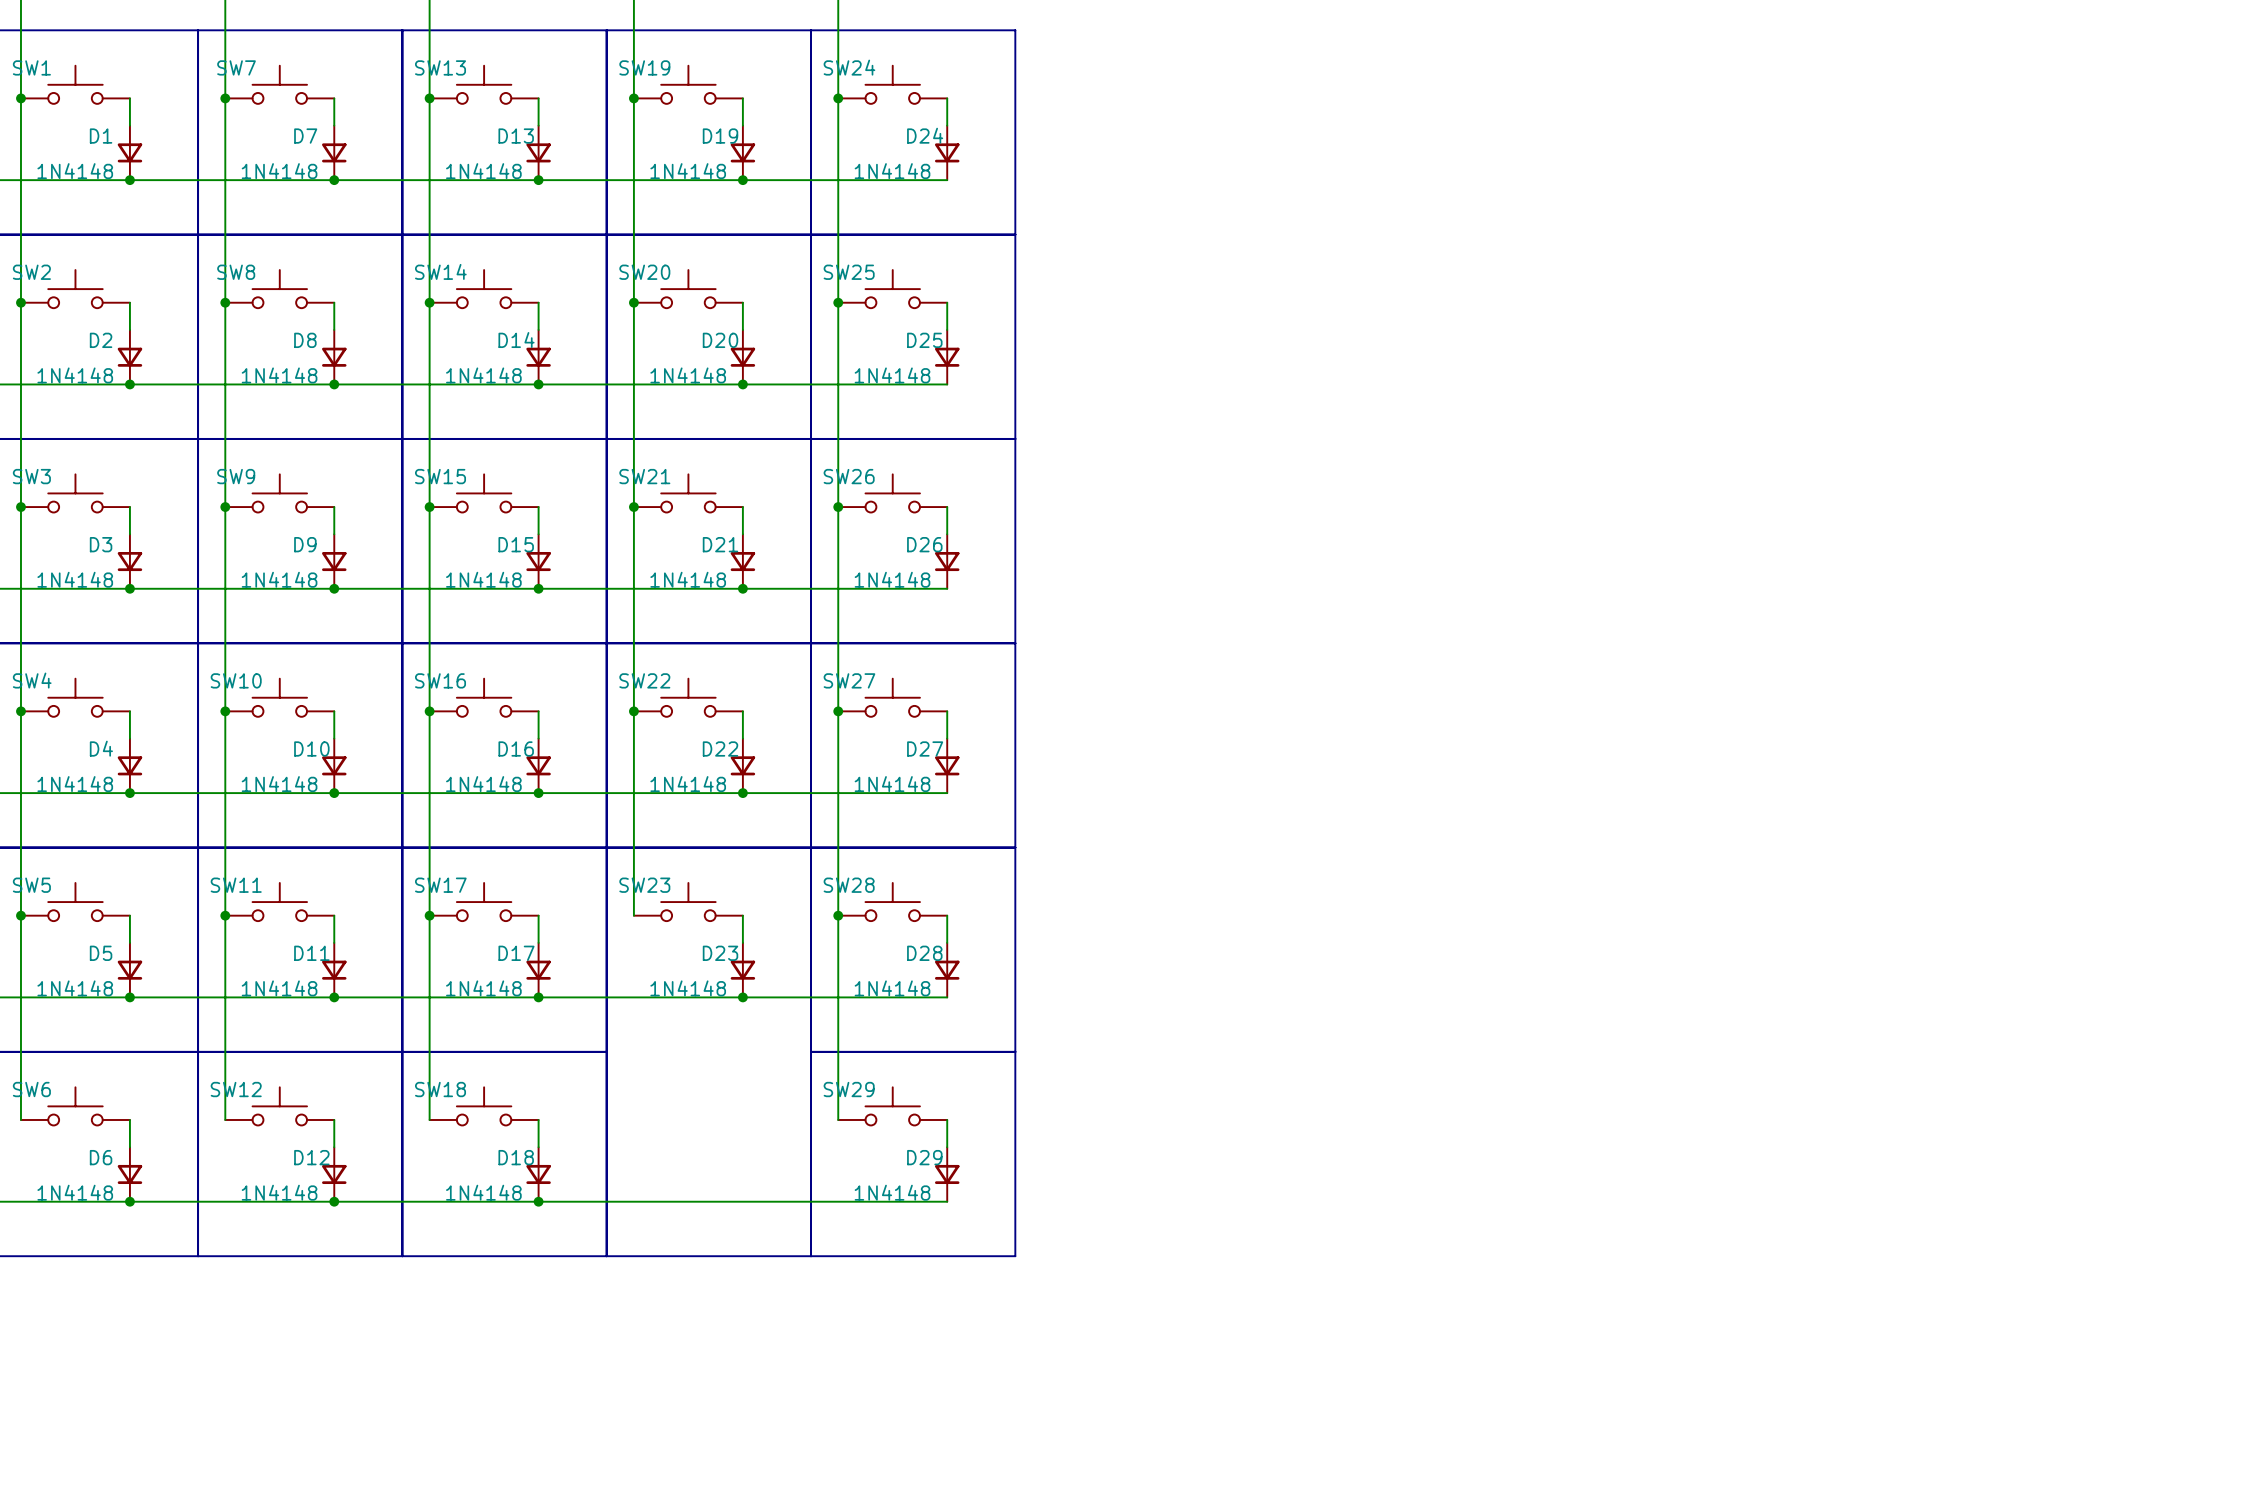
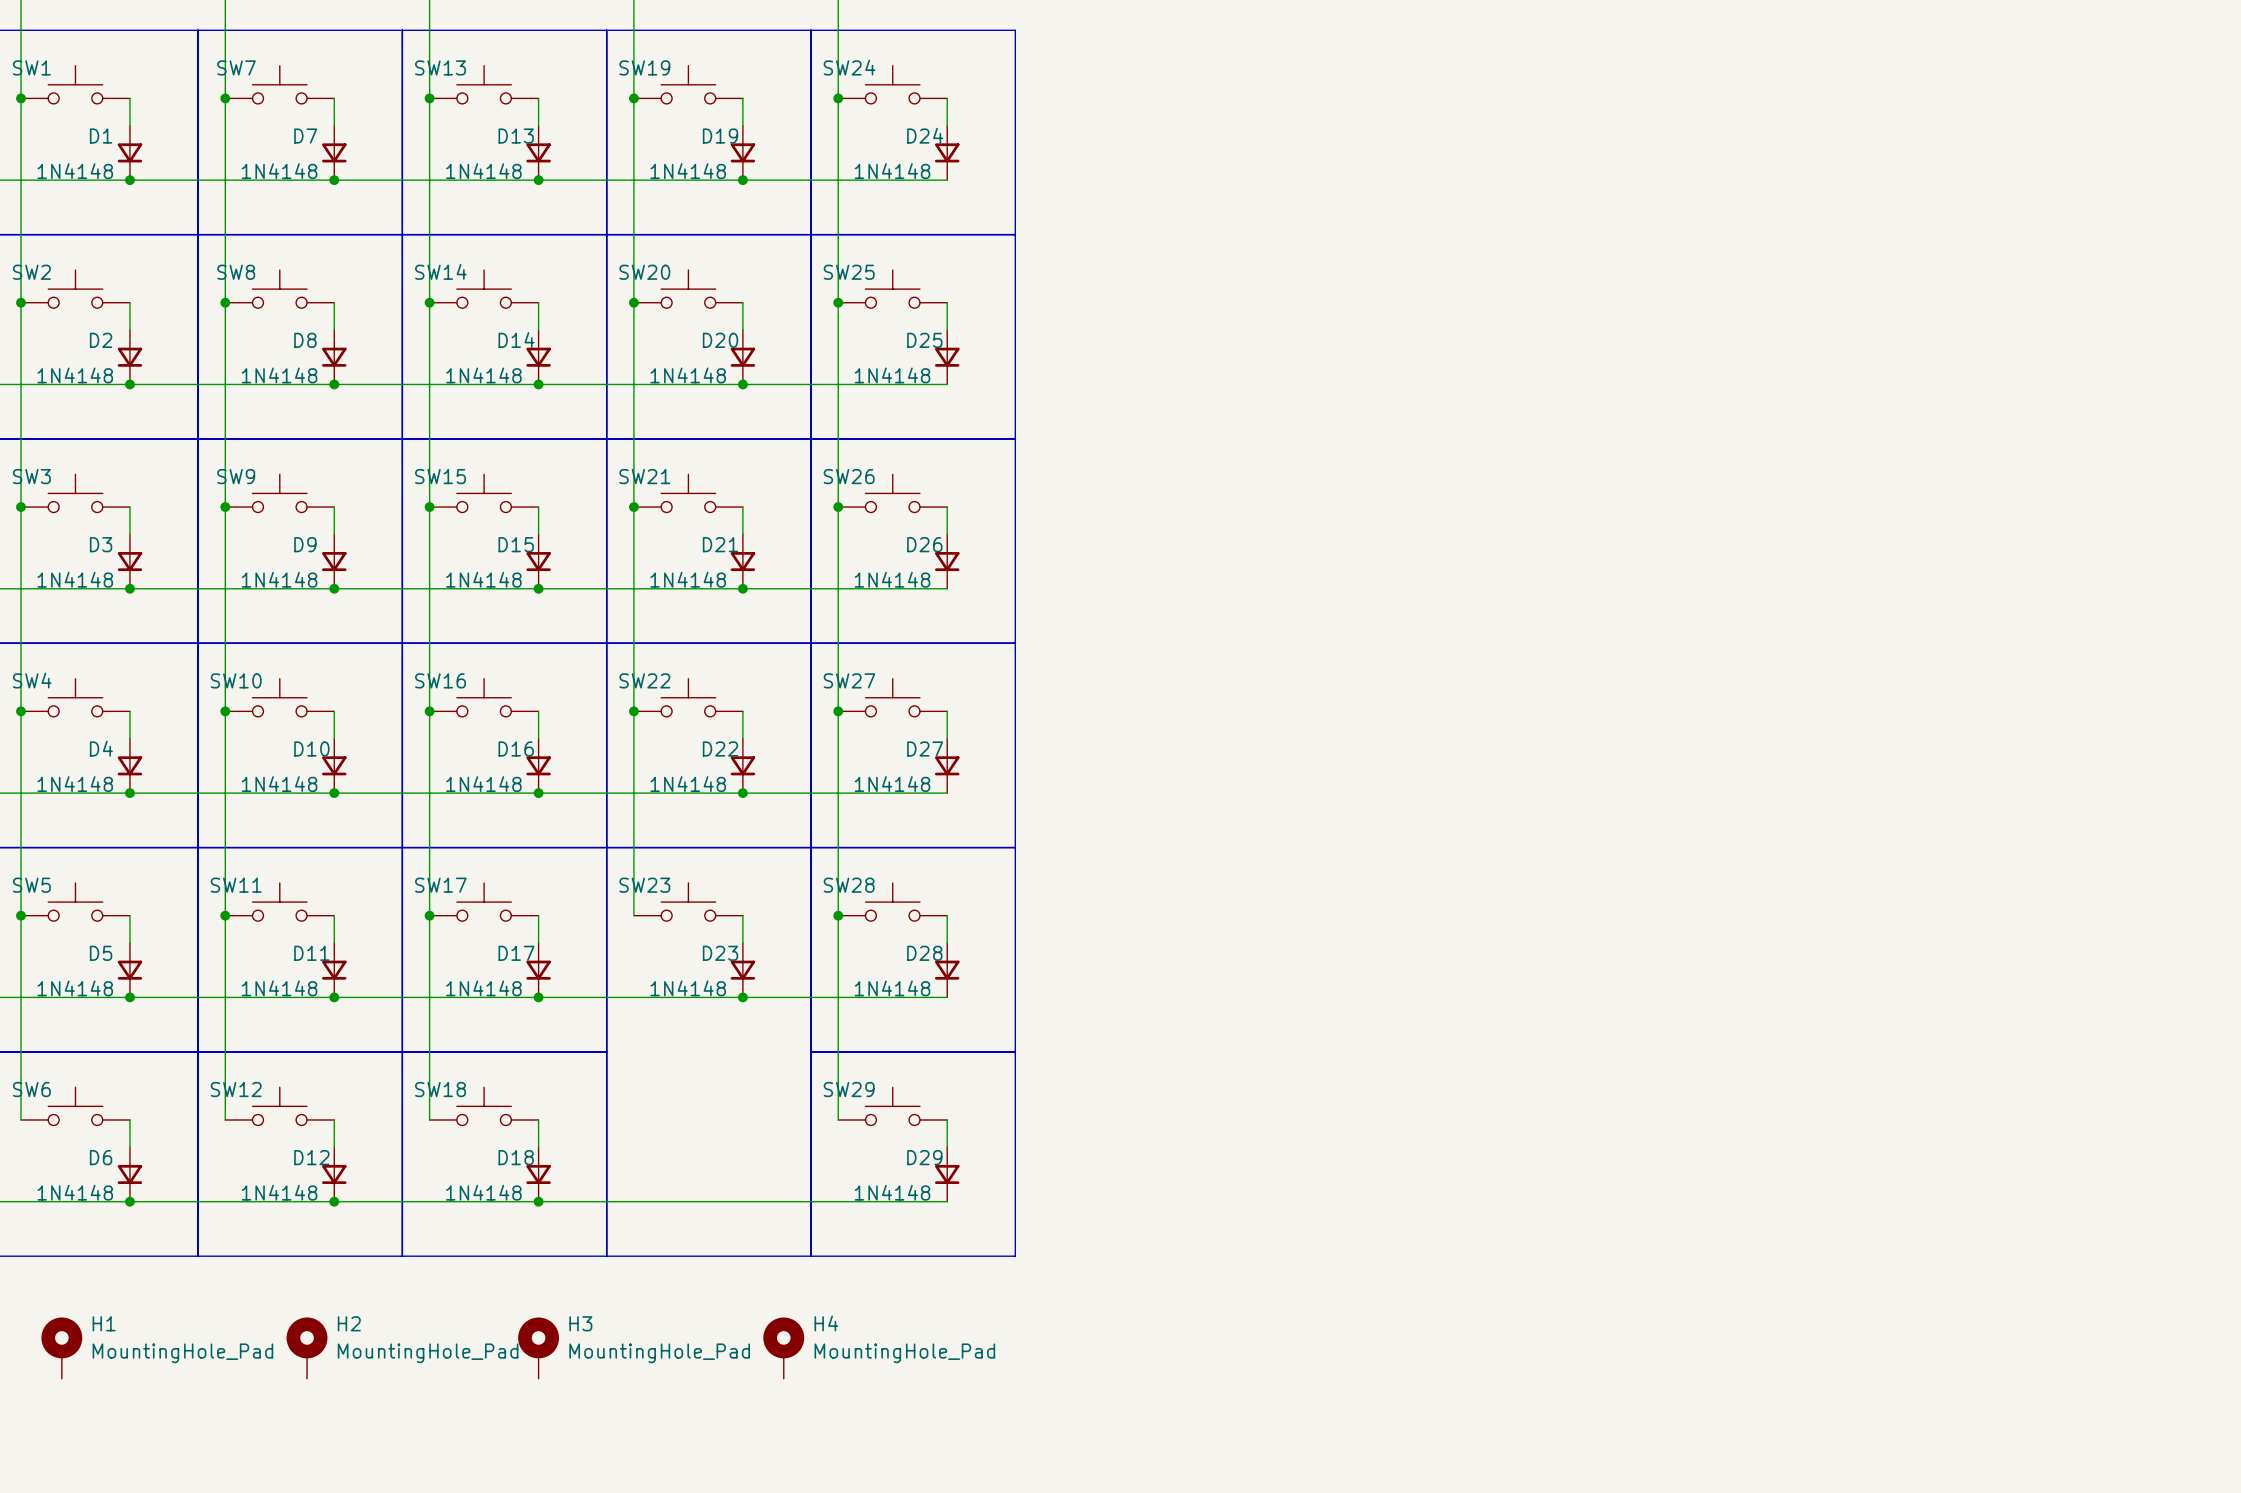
H1: none -> MountingHole_Pad (61, 1348)
H2: none -> MountingHole_Pad (307, 1348)
H3: none -> MountingHole_Pad (538, 1348)
H4: none -> MountingHole_Pad (783, 1348)

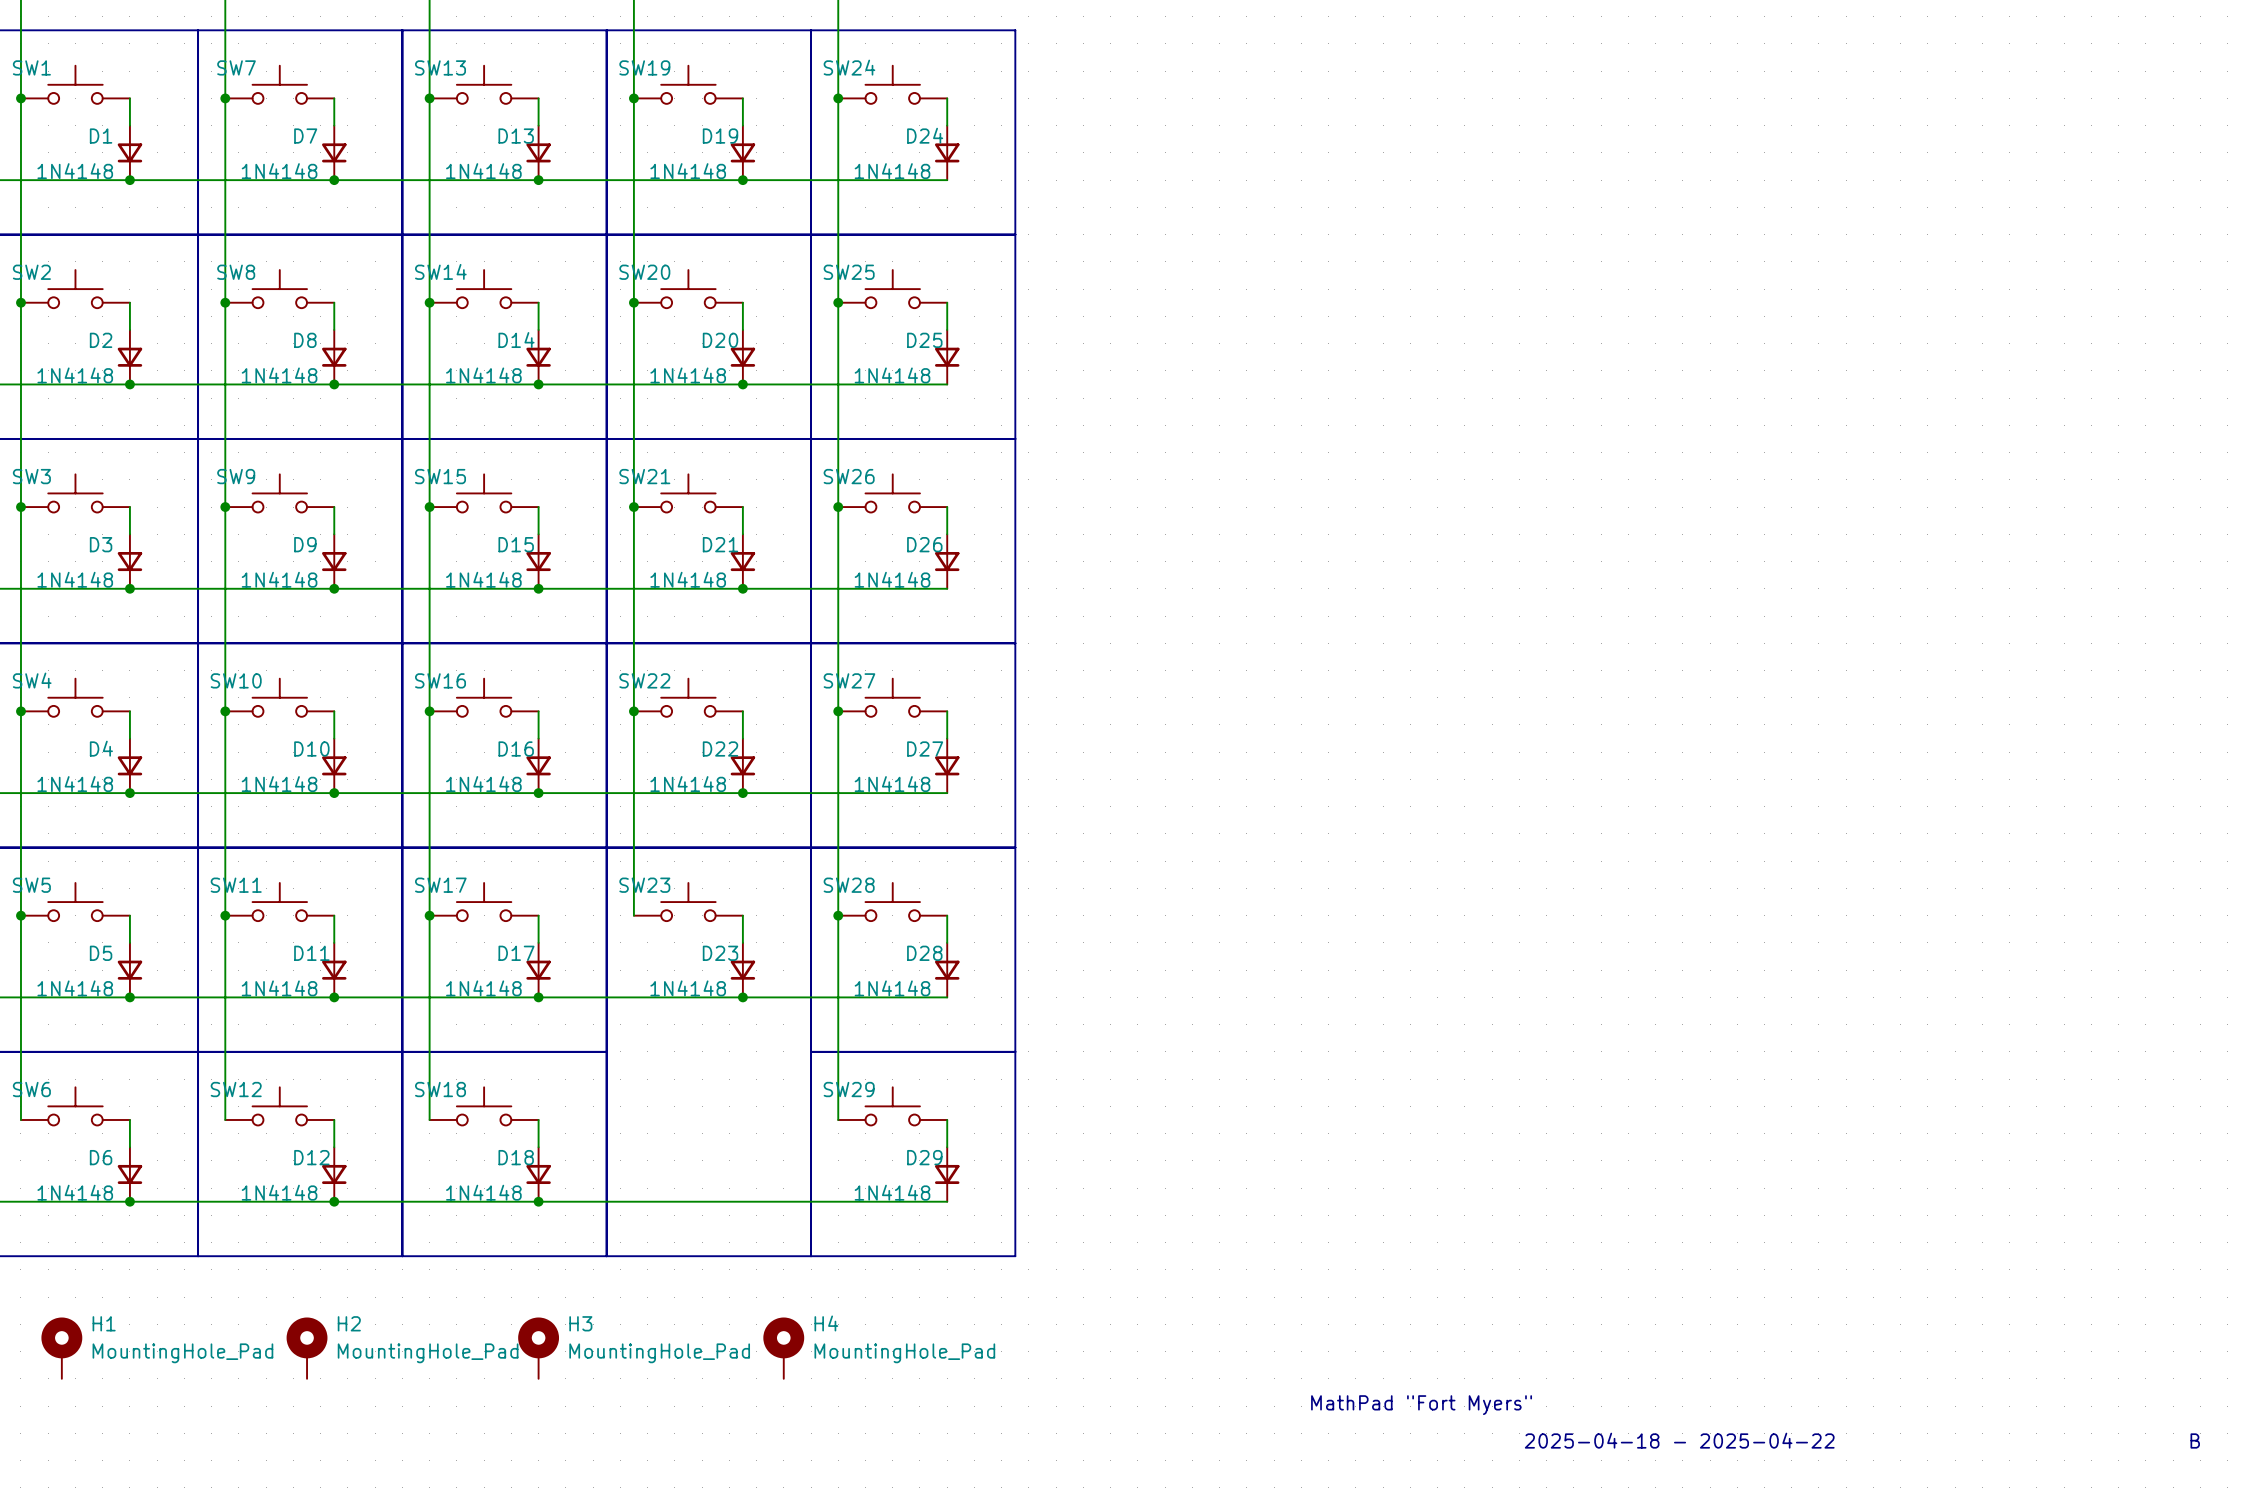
text: none -> MathPad "Fort Myers" (1421, 1405)
text: none -> 2025-04-18 - 2025-04-22 (1679, 1440)
text: none -> B (2195, 1440)

